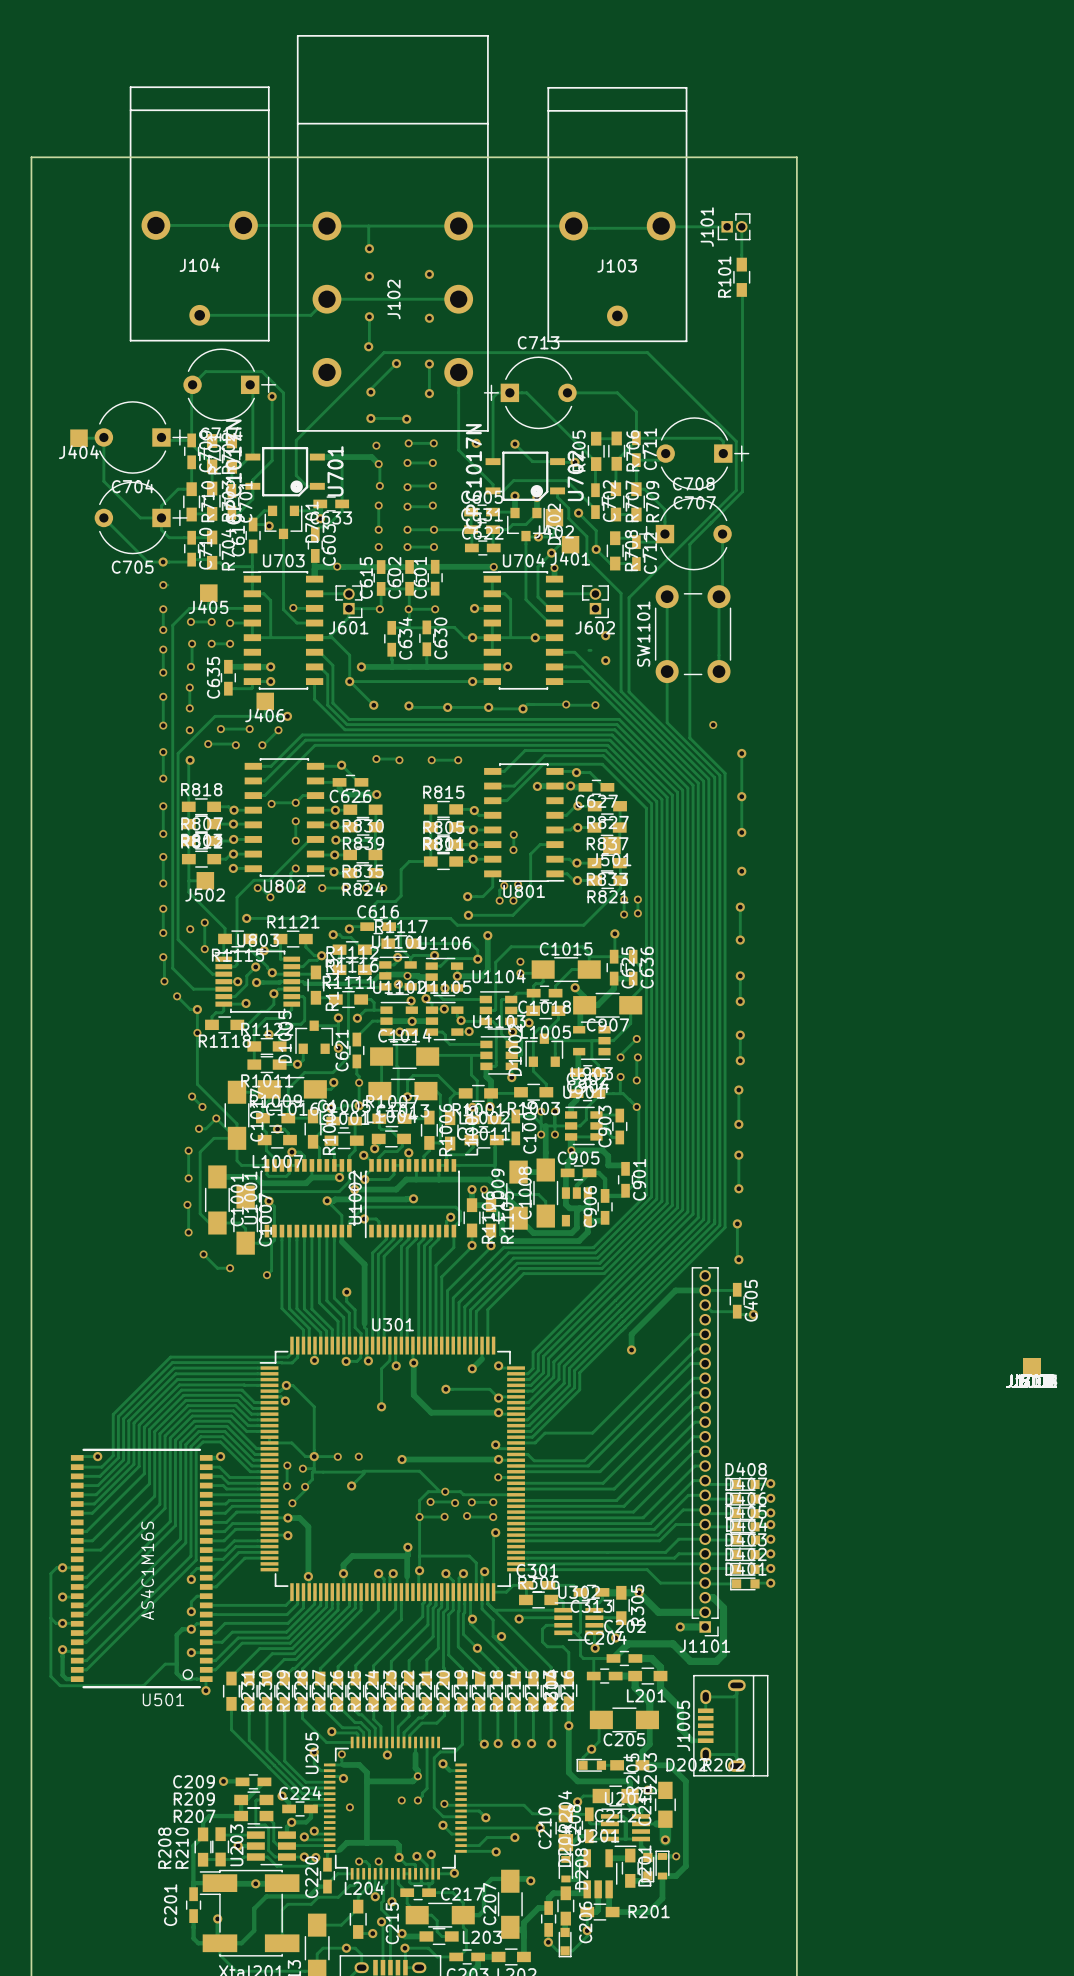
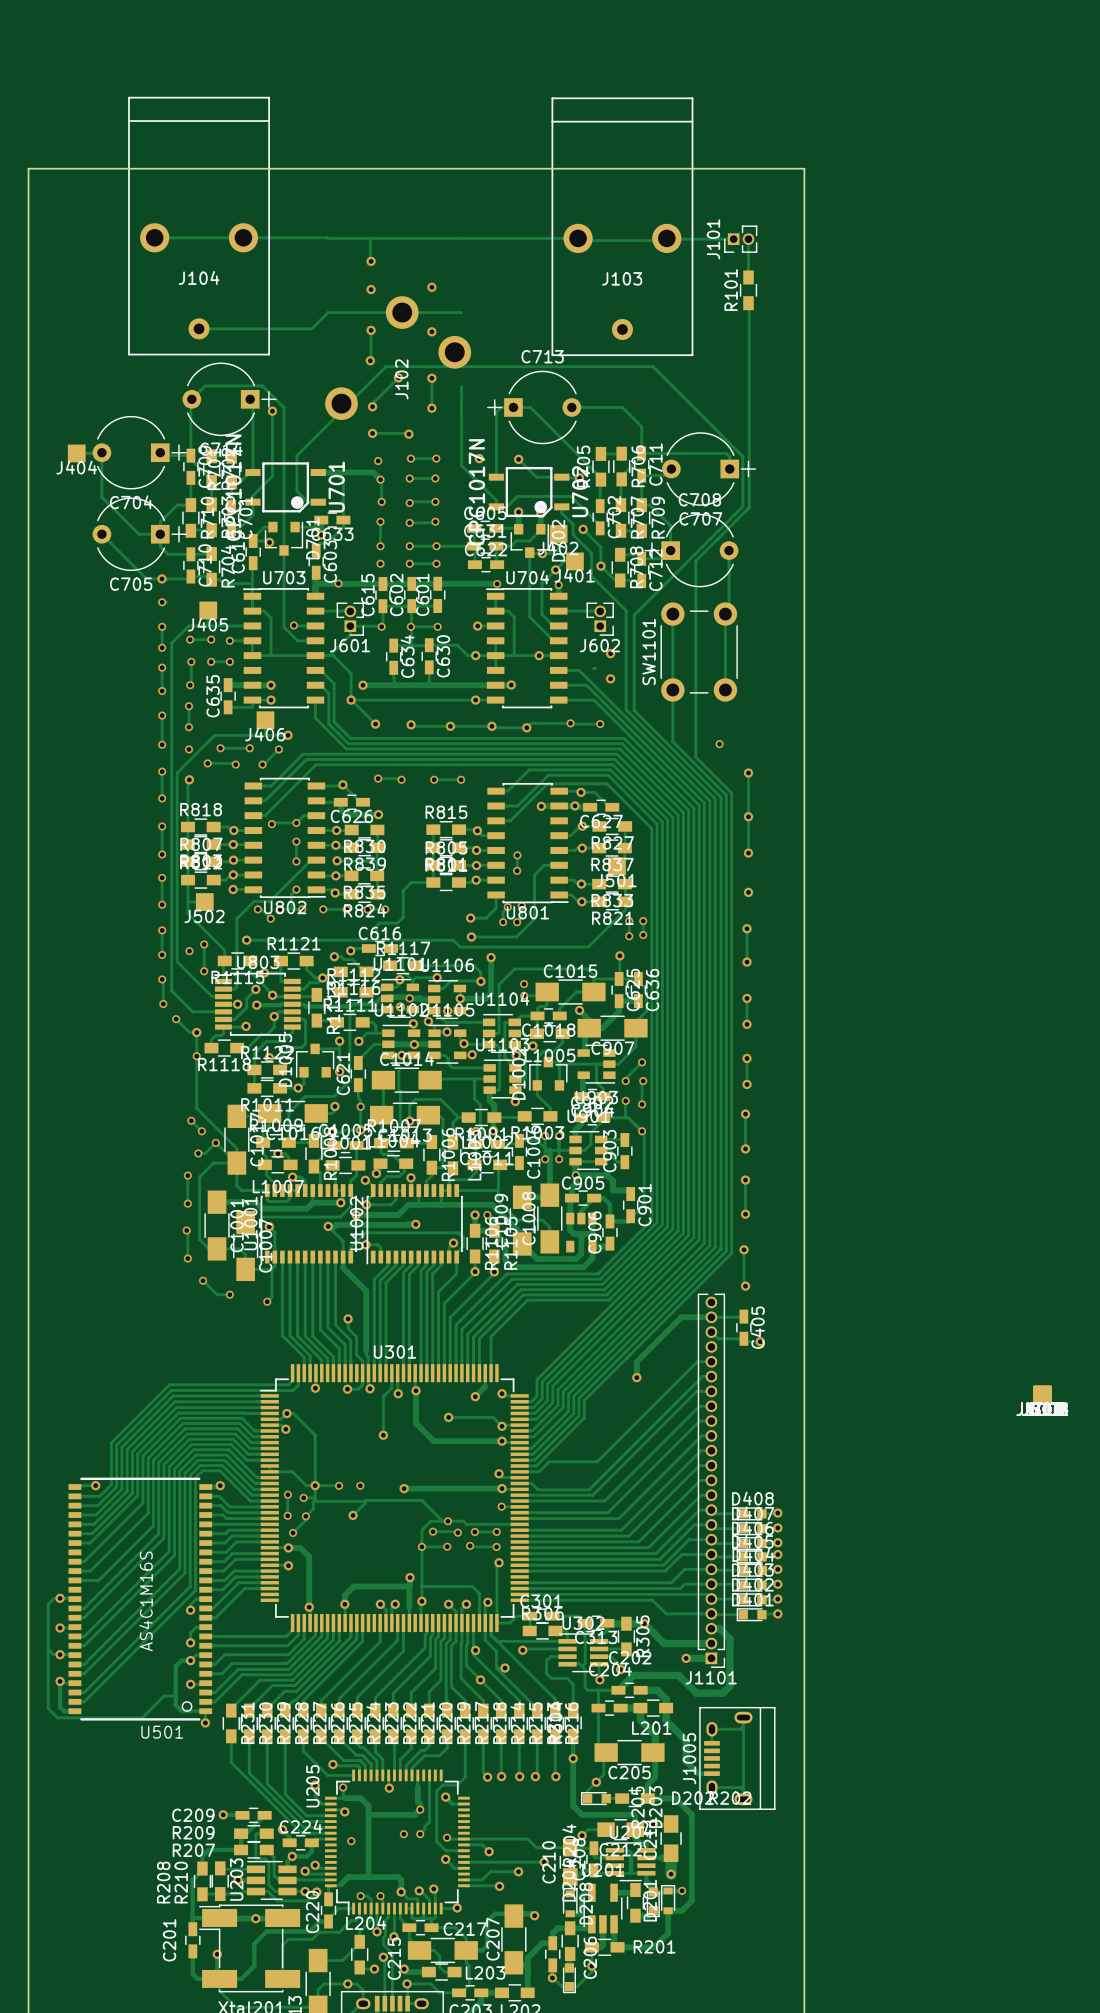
J102 footprint: [296, 35, 489, 432] -> [325, 296, 472, 420]
J102 name position: J102 (393, 299) -> J102 (401, 379)

